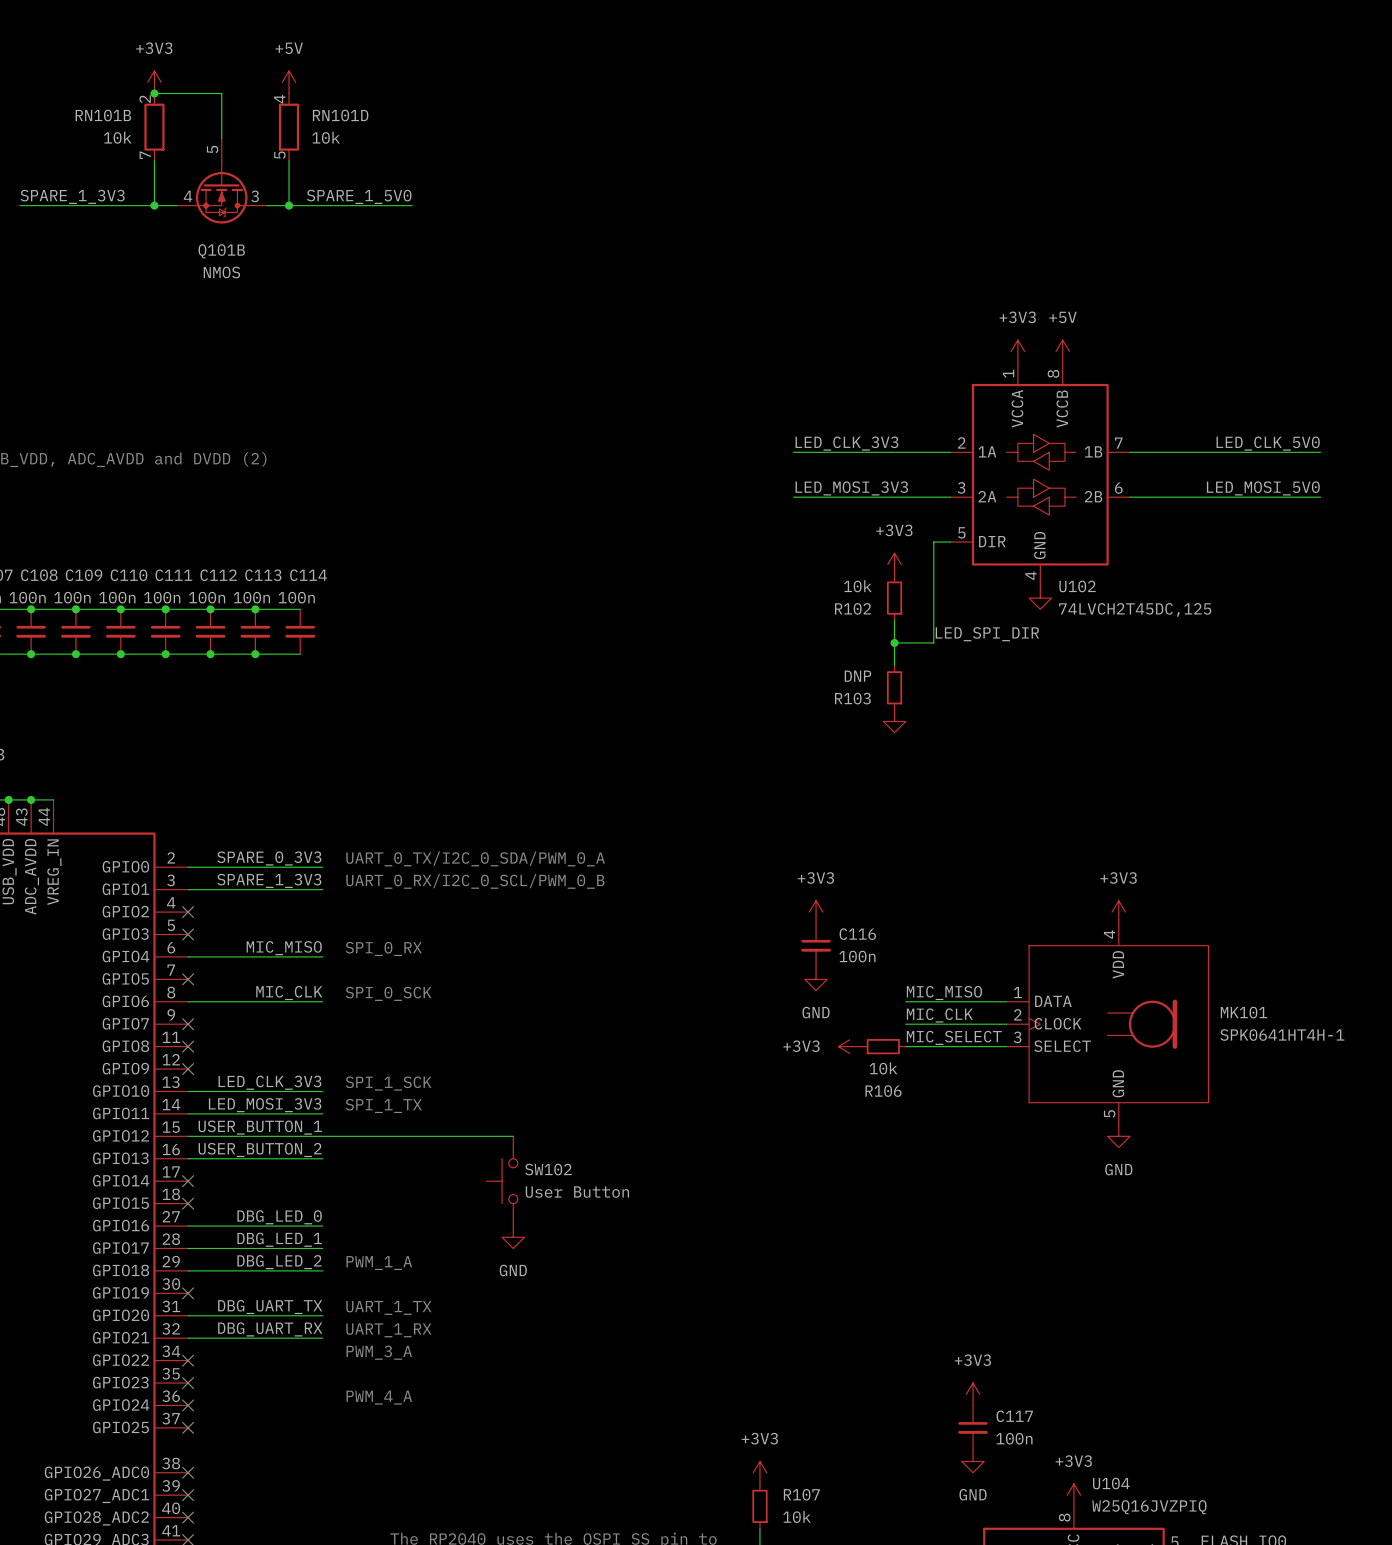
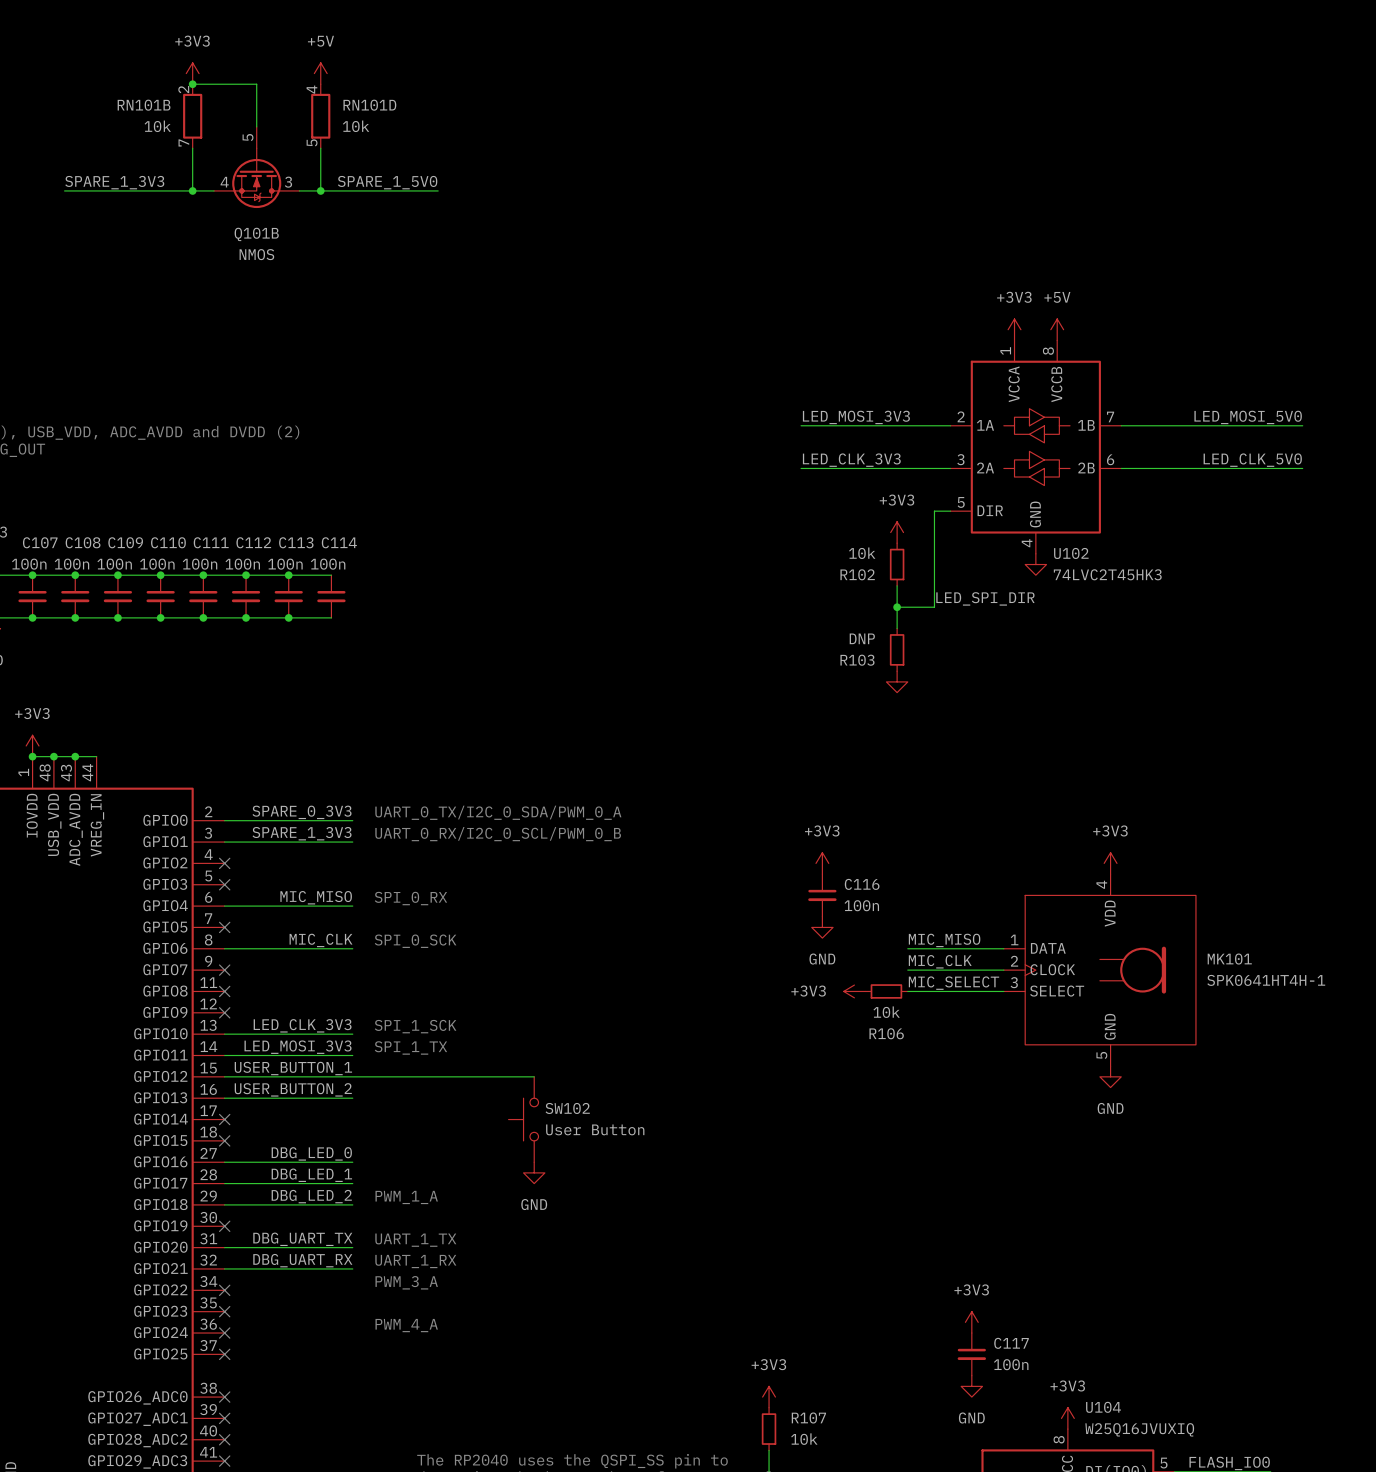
label: LED_CLK_3V3 (846, 443) -> LED_MOSI_3V3 (856, 417)
label: LED_CLK_5V0 (1268, 443) -> LED_MOSI_5V0 (1248, 417)
label: LED_MOSI_3V3 (851, 488) -> LED_CLK_3V3 (851, 460)
label: LED_MOSI_5V0 (1263, 488) -> LED_CLK_5V0 (1252, 460)
U102 value: 74LVCH2T45DC,125 (1135, 609) -> 74LVC2T45HK3 (1107, 574)
U104 value: W25Q16JVZPIQ (1149, 1507) -> W25Q16JVUXIQ (1139, 1429)

